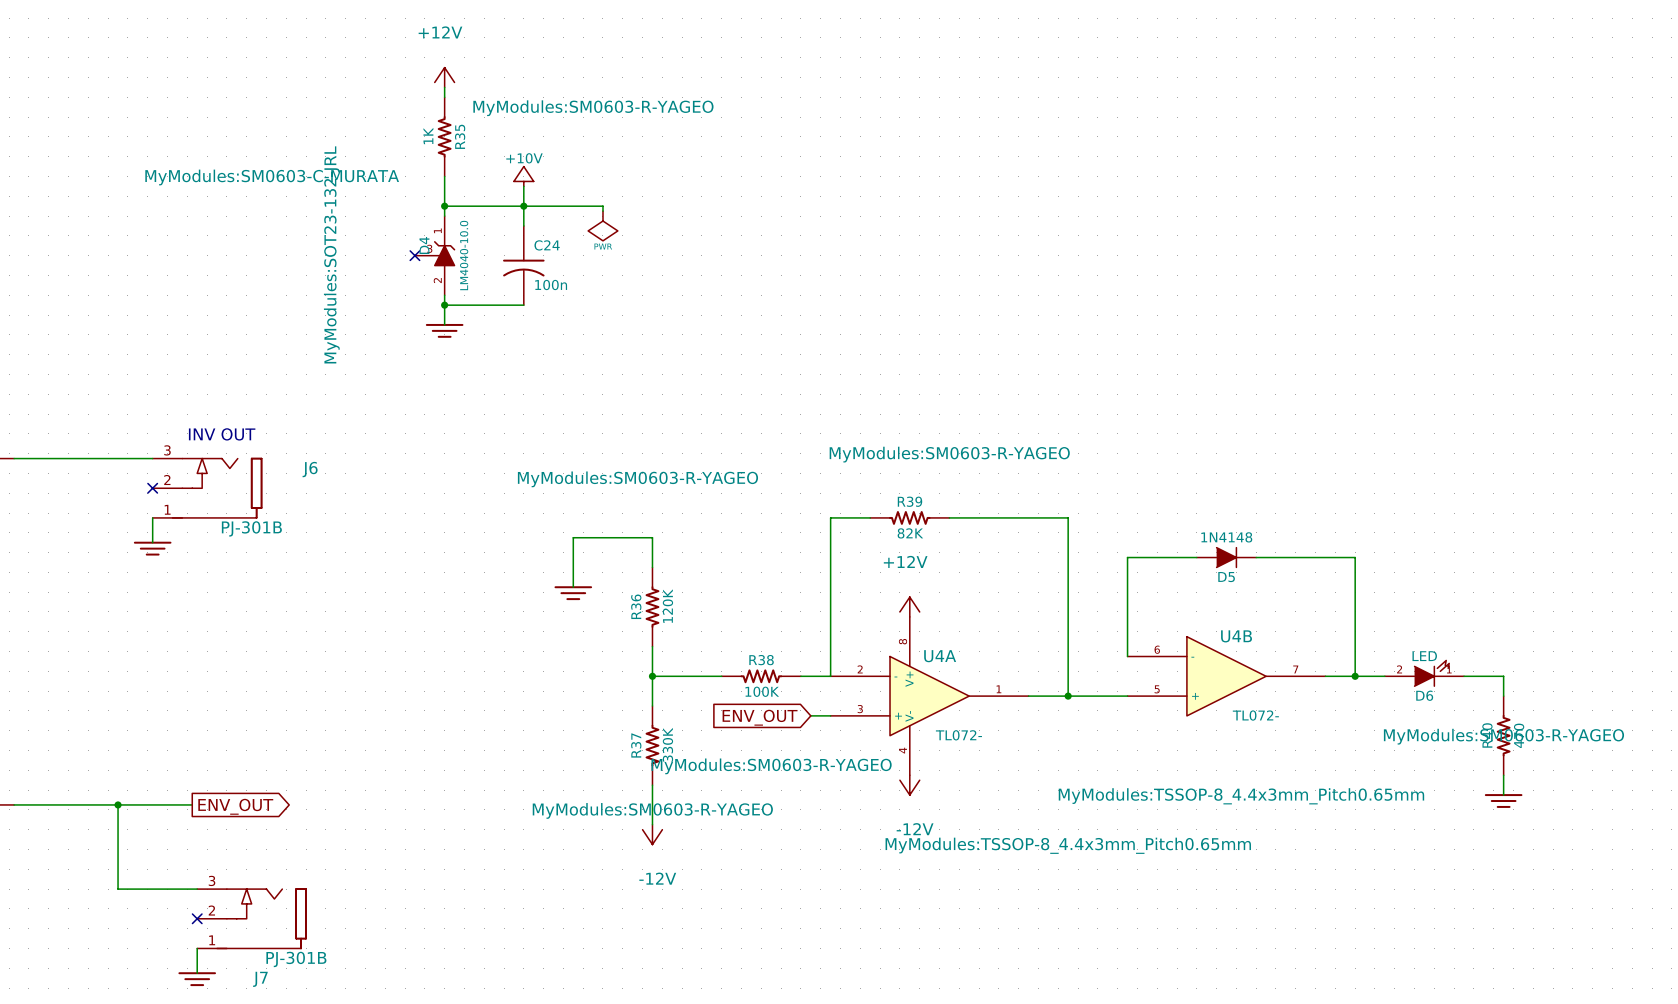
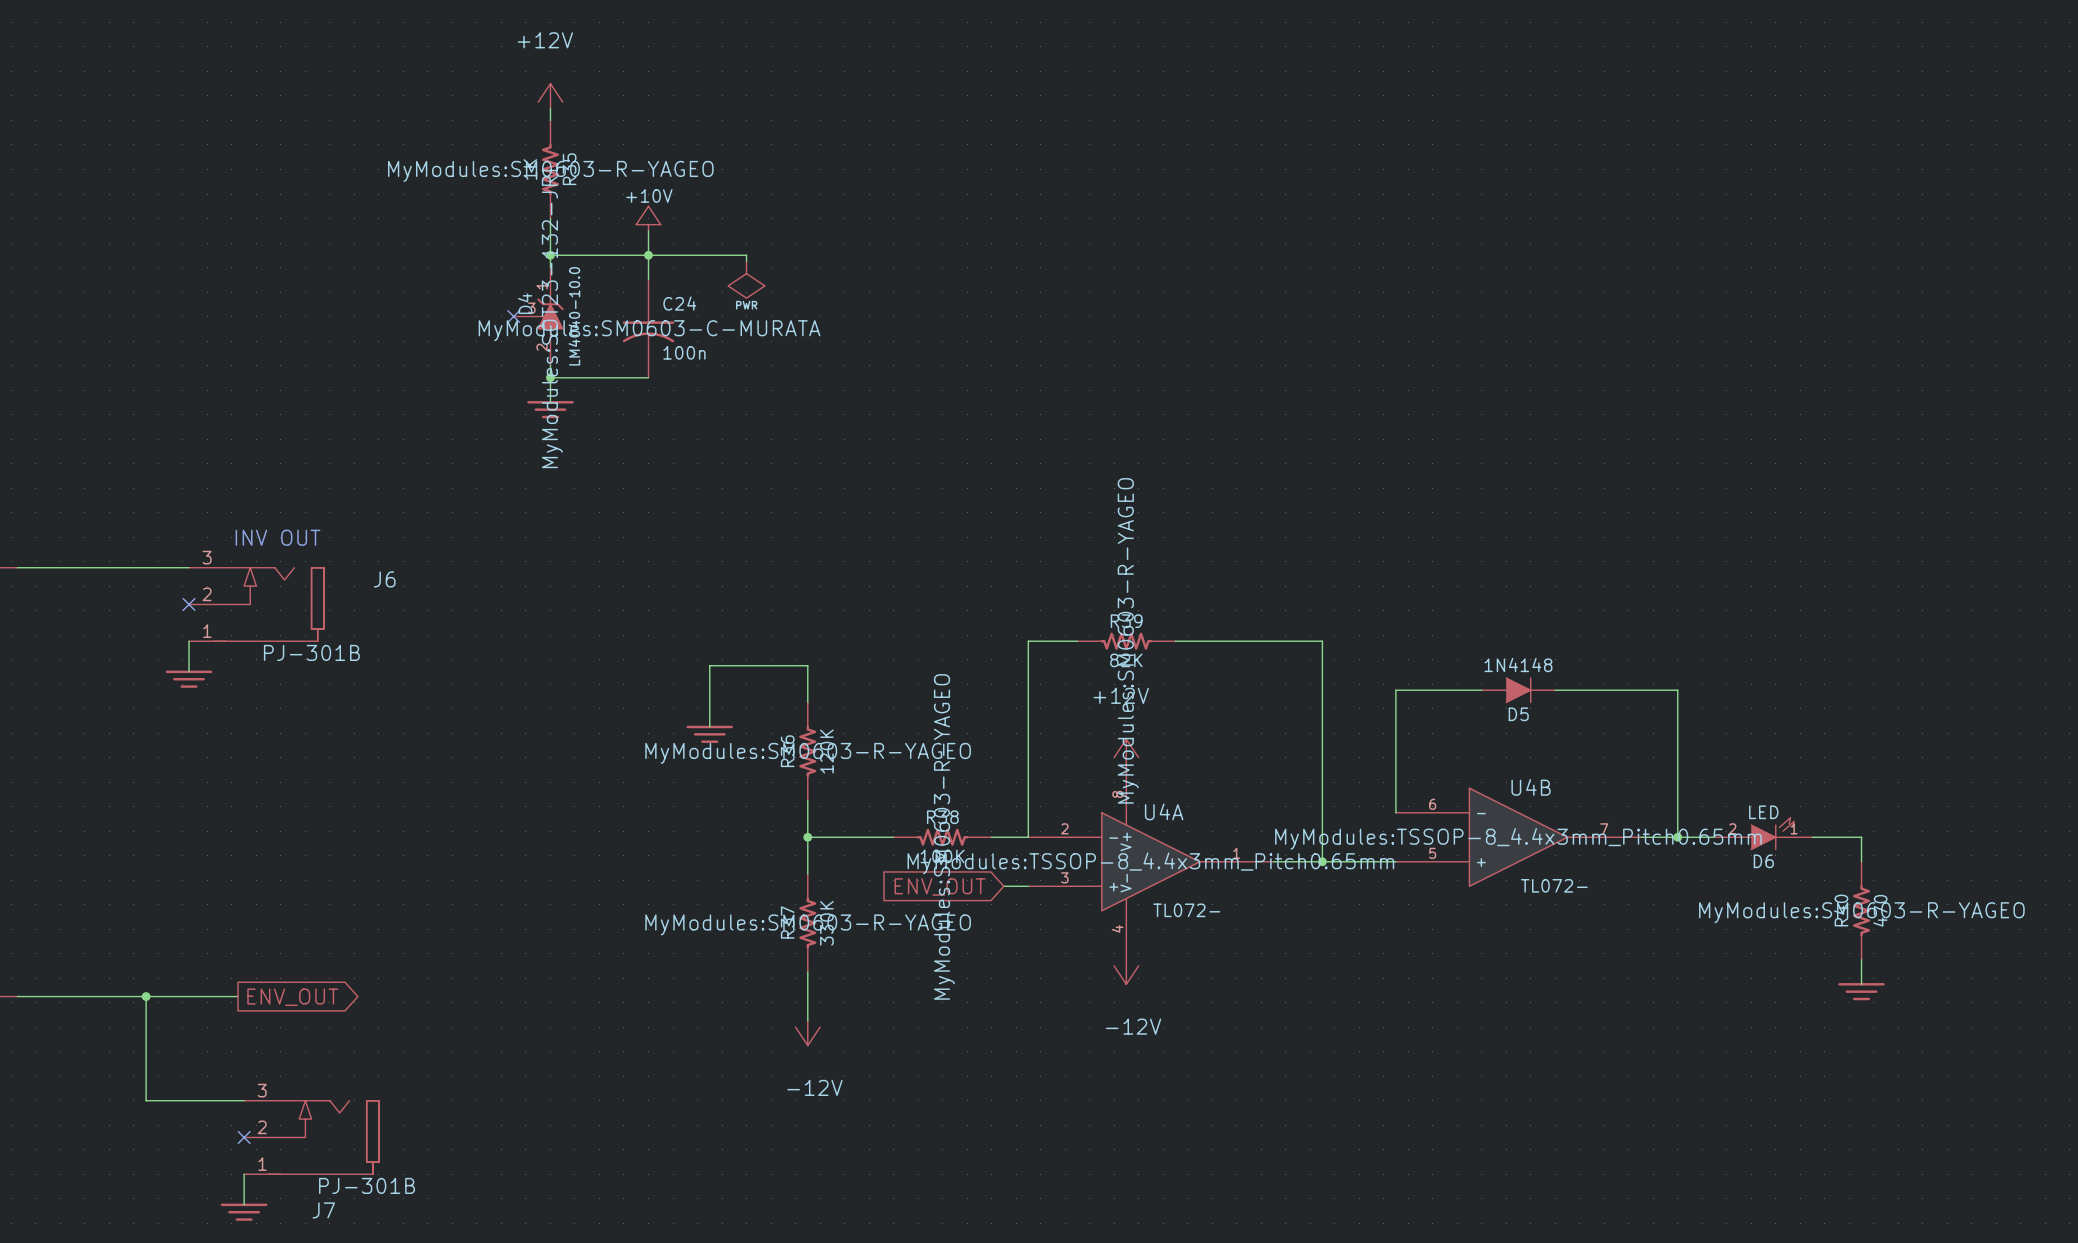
R35 text position: MyModules:SM0603-R-YAGEO (593, 108) -> MyModules:SM0603-R-YAGEO (550, 171)
C24 text position: MyModules:SM0603-C-MURATA (272, 177) -> MyModules:SM0603-C-MURATA (649, 330)
D4 text position: MyModules:SOT23-132-JRL (331, 254) -> MyModules:SOT23-132-JRL (552, 315)
R39 text rotation: 0° (949, 454) -> 90° counterclockwise (1128, 640)
R36 text position: MyModules:SM0603-R-YAGEO (637, 479) -> MyModules:SM0603-R-YAGEO (808, 753)
R38 text rotation: 0° (771, 766) -> 90° counterclockwise (944, 836)
U4B text position: MyModules:TSSOP-8_4.4x3mm_Pitch0.65mm (1241, 796) -> MyModules:TSSOP-8_4.4x3mm_Pitch0.65mm (1518, 838)
R37 text position: MyModules:SM0603-R-YAGEO (652, 810) -> MyModules:SM0603-R-YAGEO (808, 924)
U4A text position: MyModules:TSSOP-8_4.4x3mm_Pitch0.65mm (1068, 845) -> MyModules:TSSOP-8_4.4x3mm_Pitch0.65mm (1150, 863)

